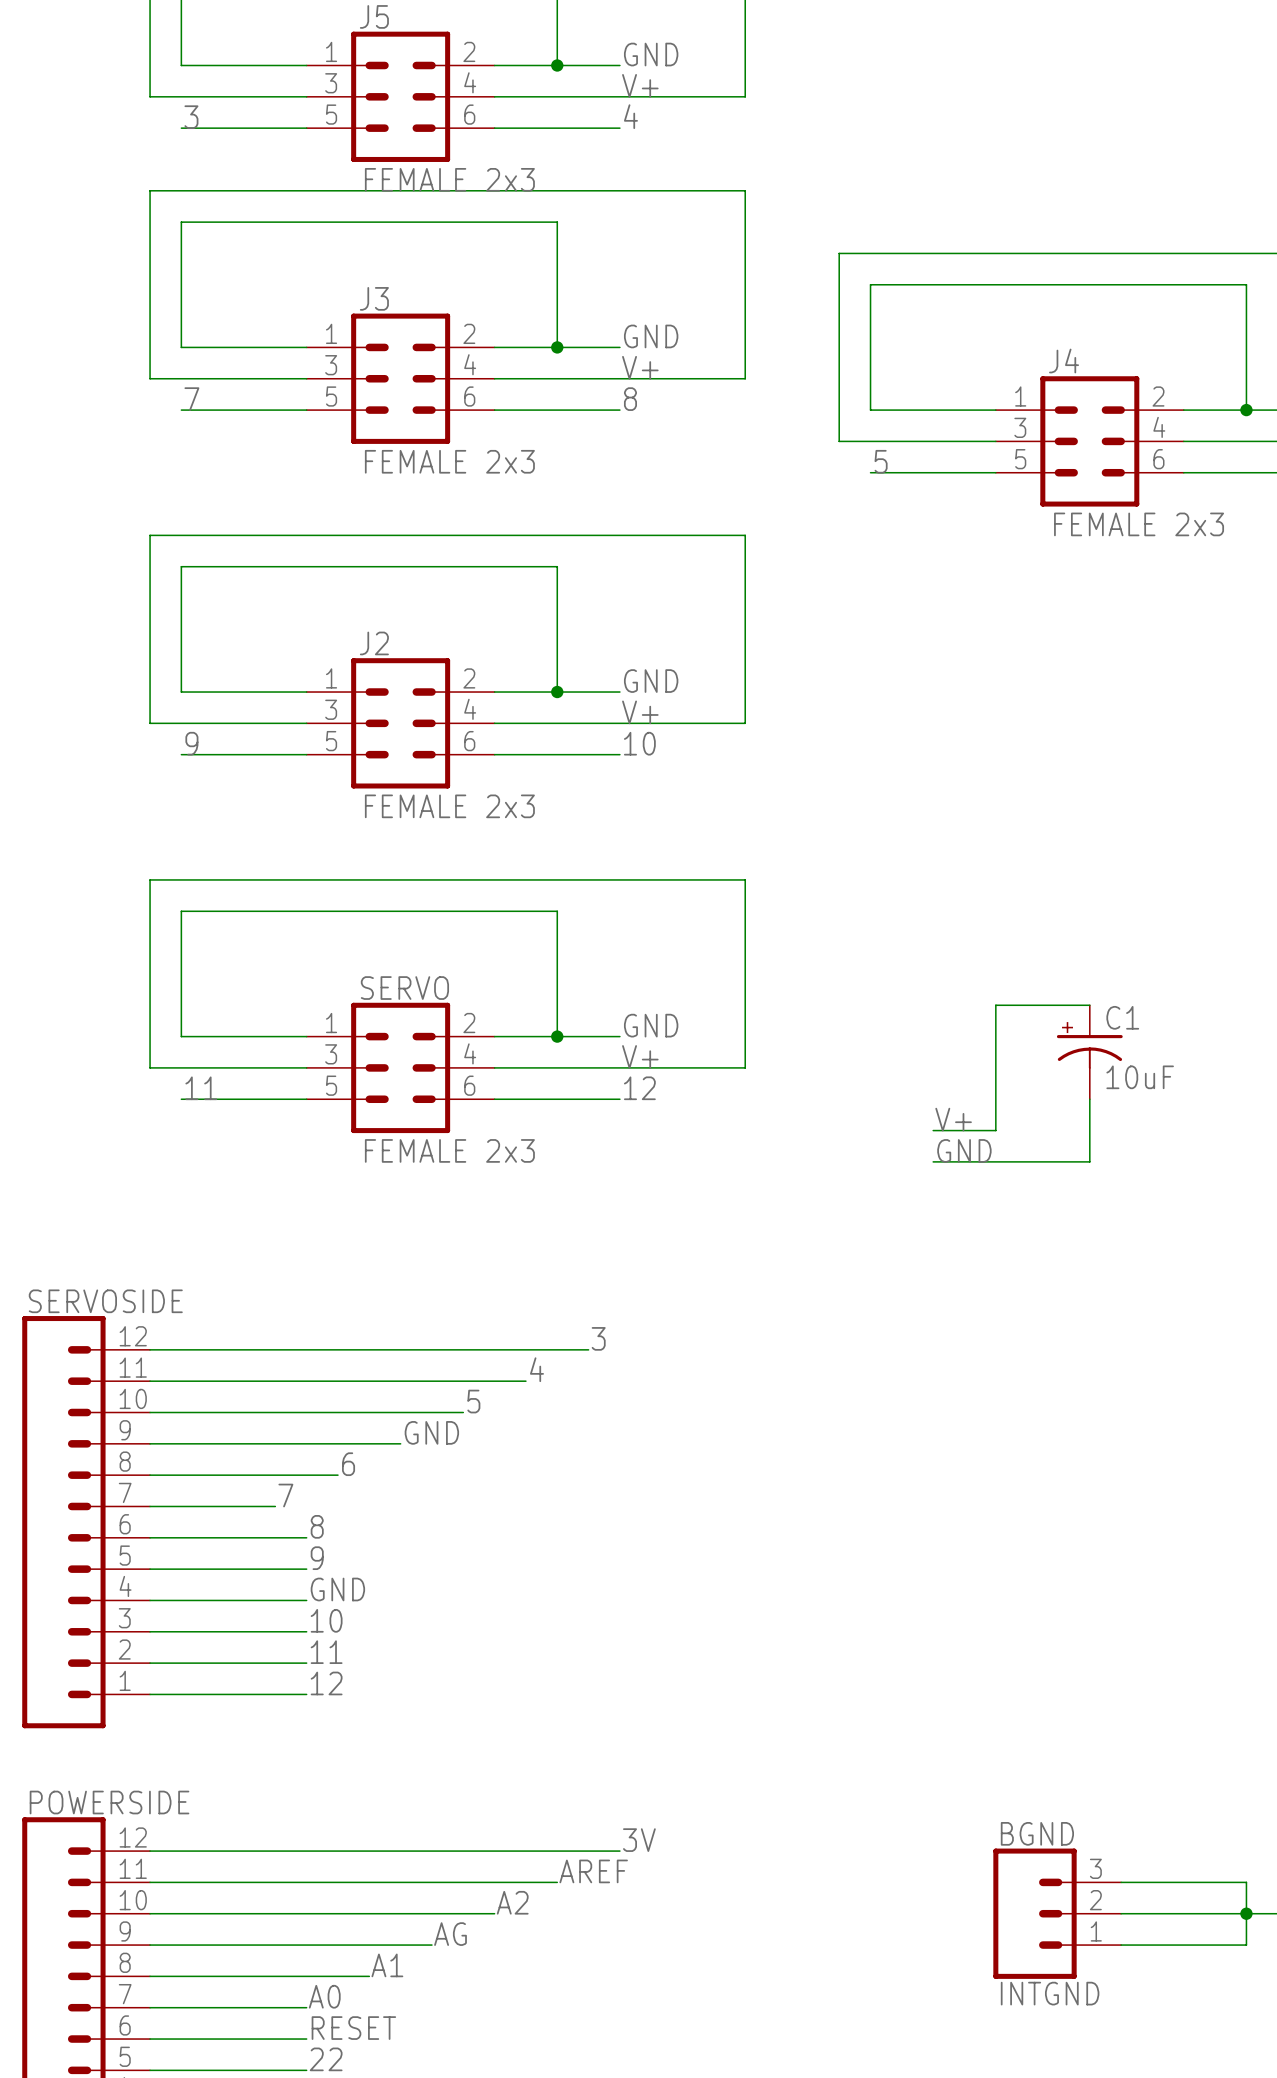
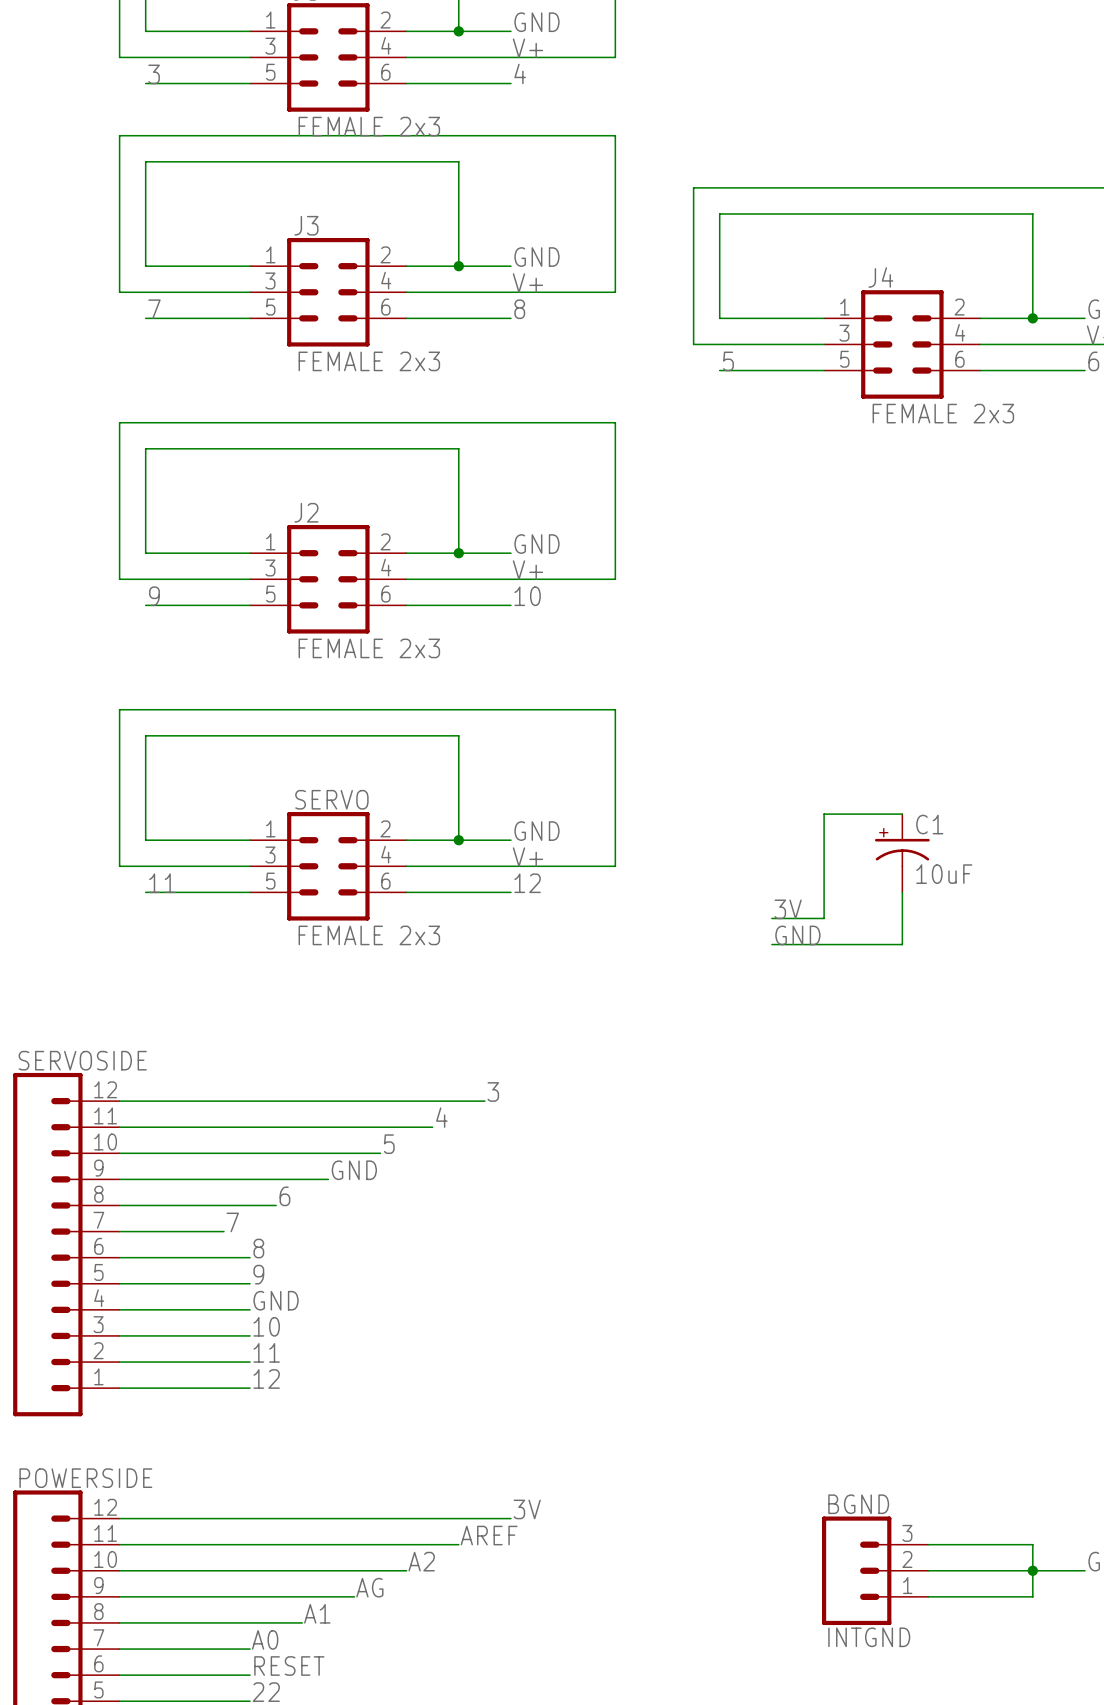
label: V+ (953, 1119) -> 3V (788, 909)

